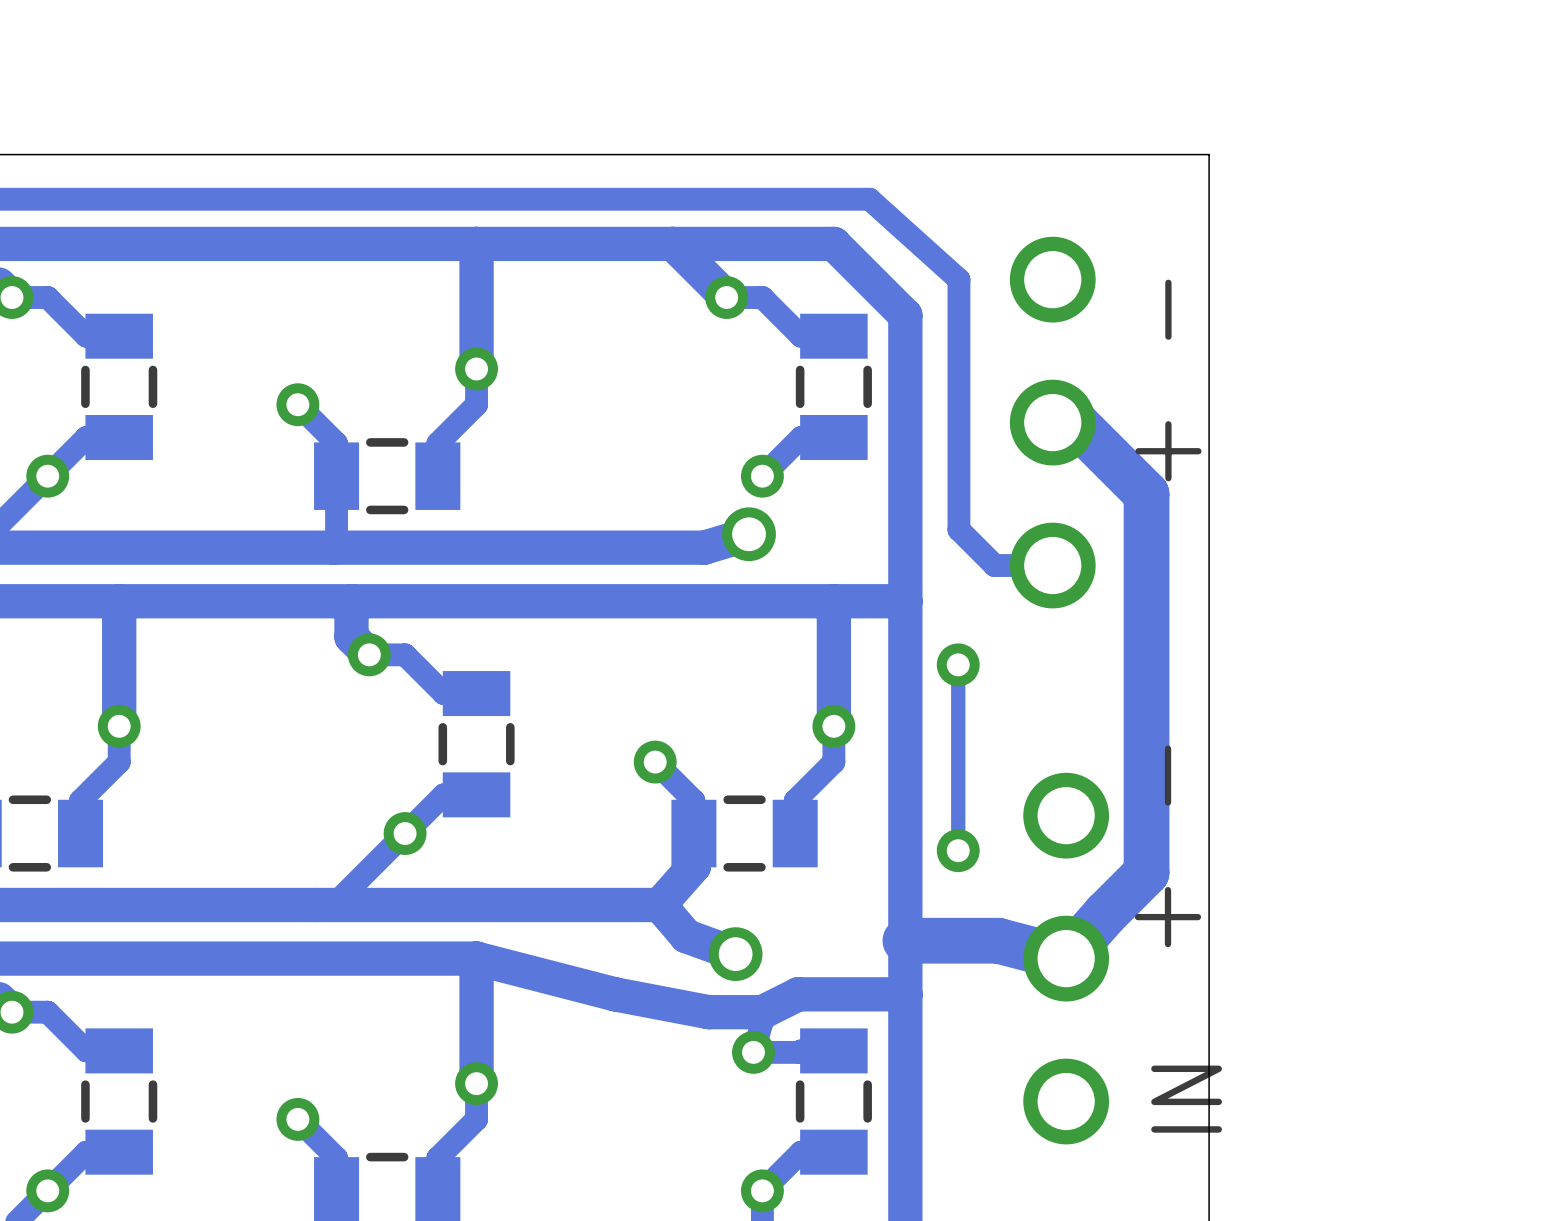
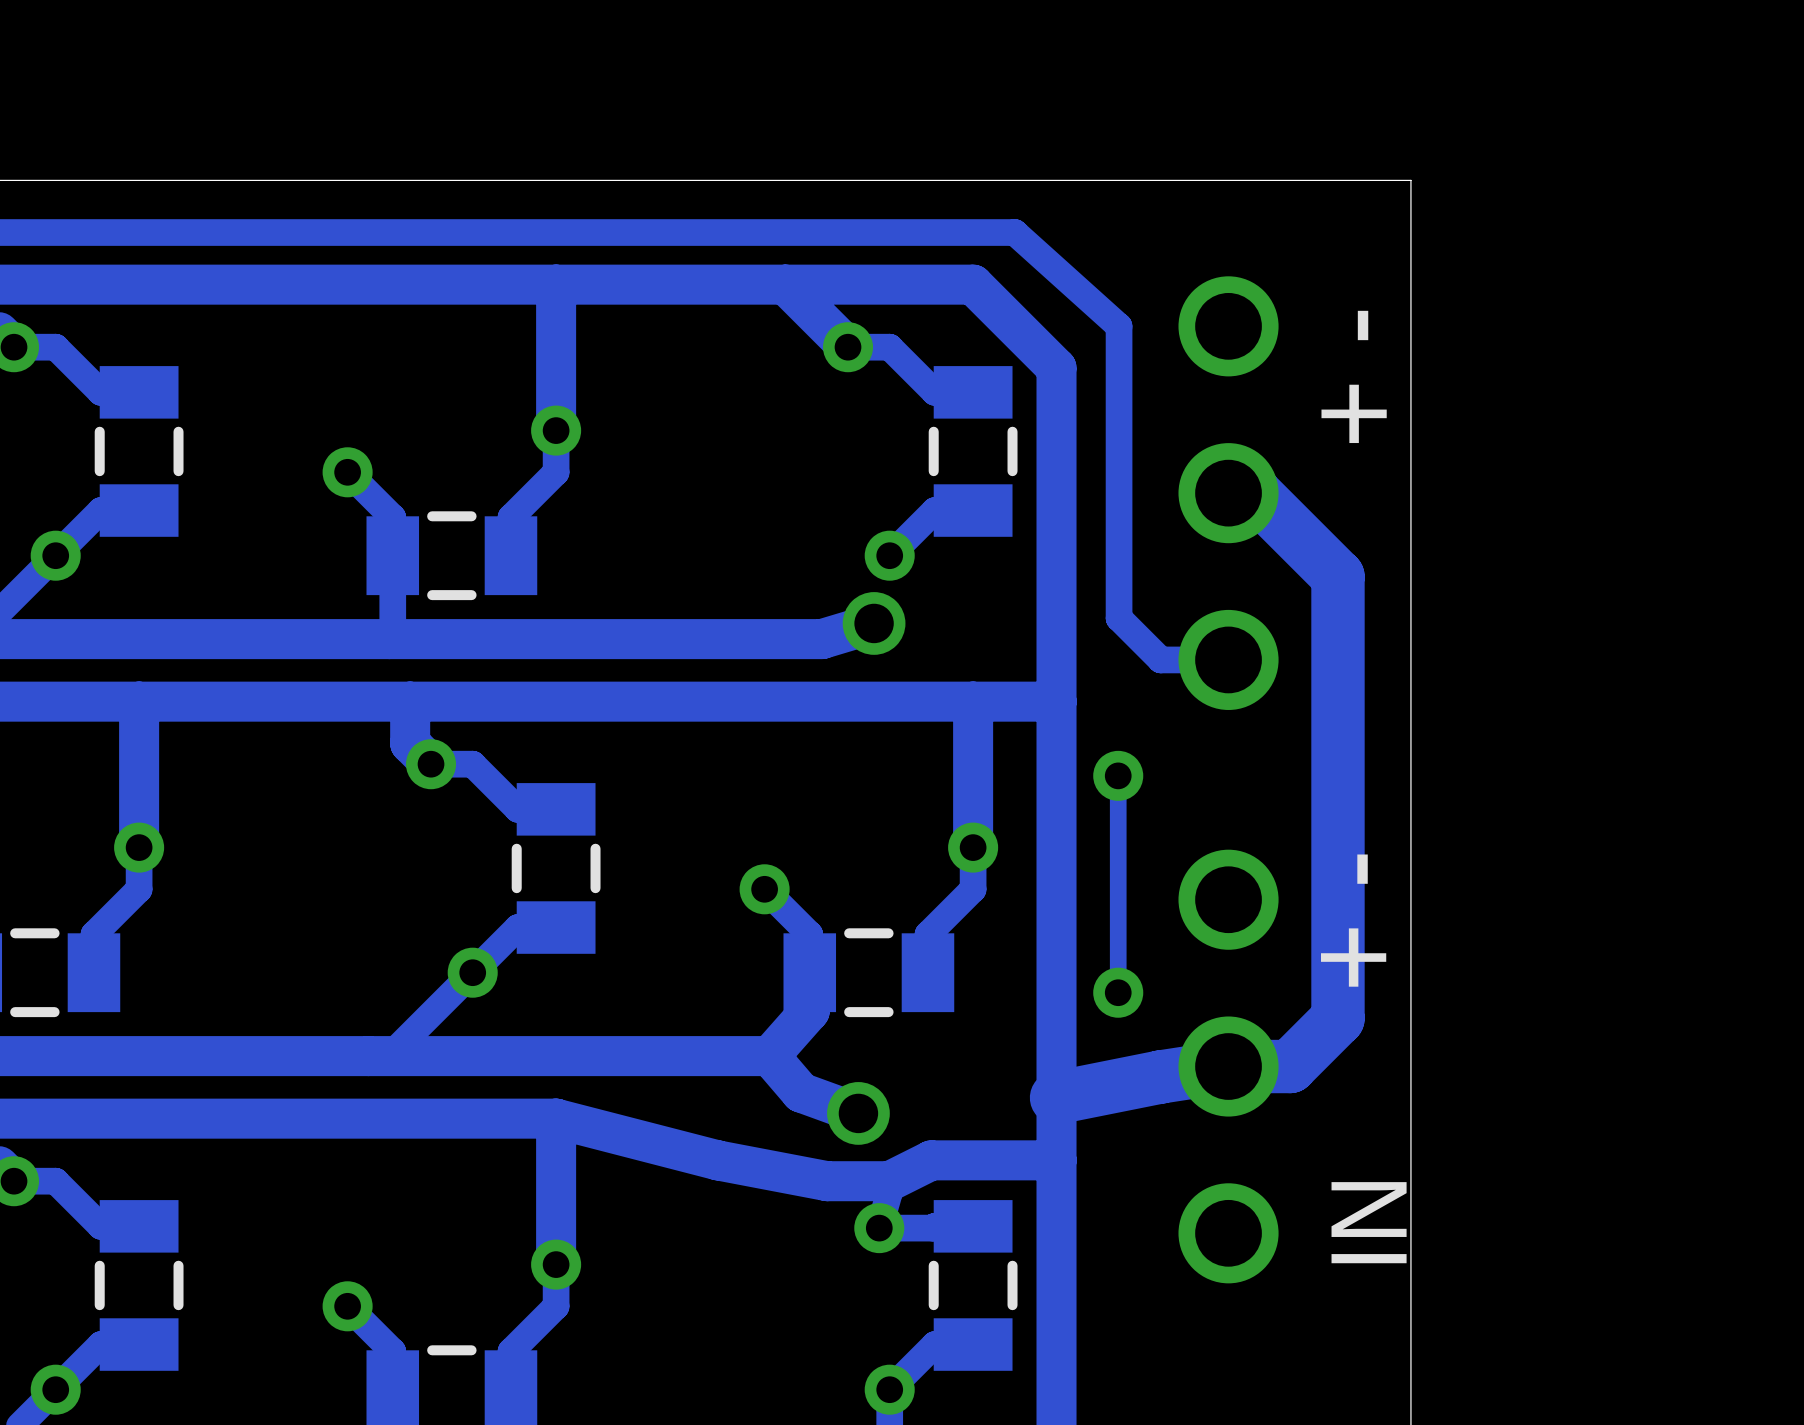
track: (1105, 913) (1066, 958) (998, 940) (905, 940) -> (1290, 1066) (1228, 1066) (1160, 1076) (1056, 1097)
IN position: (1066, 958) -> (1228, 1066)

